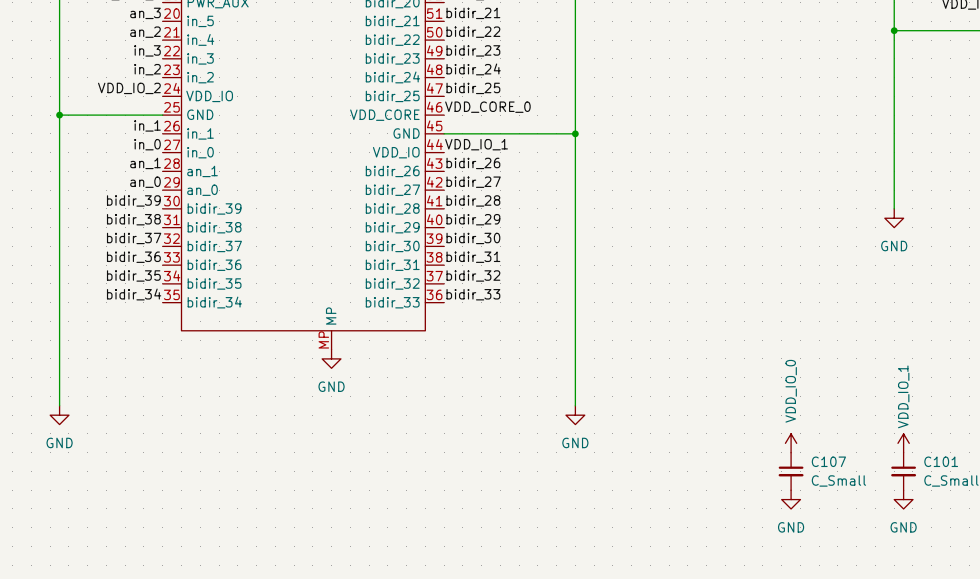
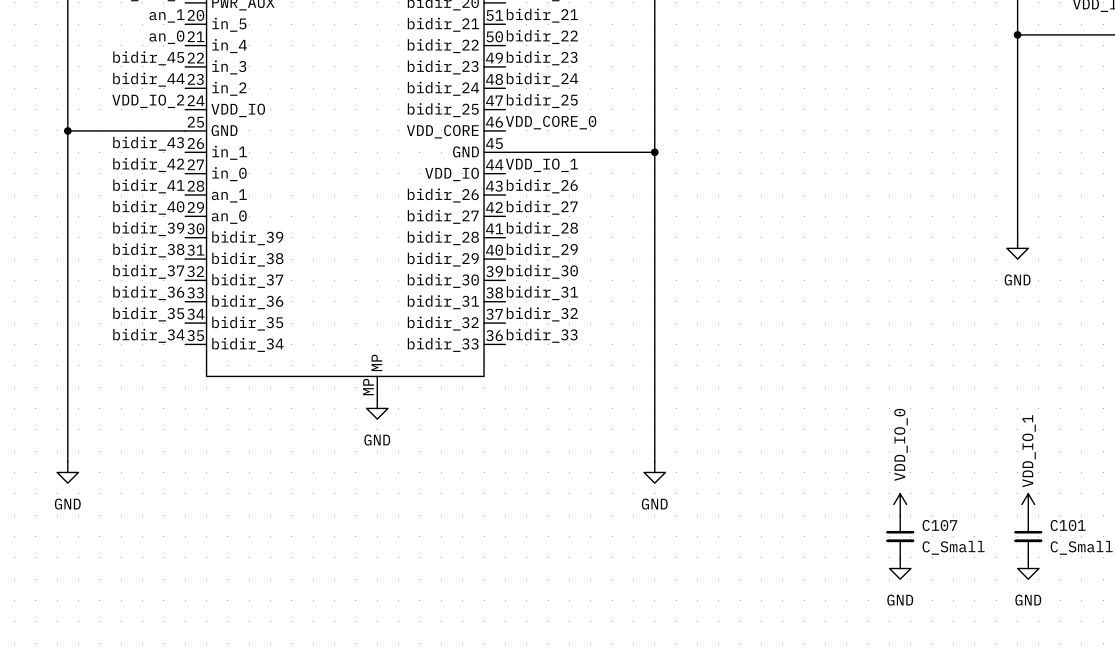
label: an_3 (145, 13) -> an_1 (166, 16)
label: an_2 (145, 32) -> an_0 (166, 37)
label: in_3 (147, 50) -> bidir_45 (148, 58)
label: in_2 (147, 69) -> bidir_44 (148, 79)
label: in_1 (147, 125) -> bidir_43 (148, 143)
label: in_0 (147, 144) -> bidir_42 (148, 165)
label: an_1 (145, 163) -> bidir_41 (148, 186)
label: an_0 (145, 182) -> bidir_40 (148, 207)

